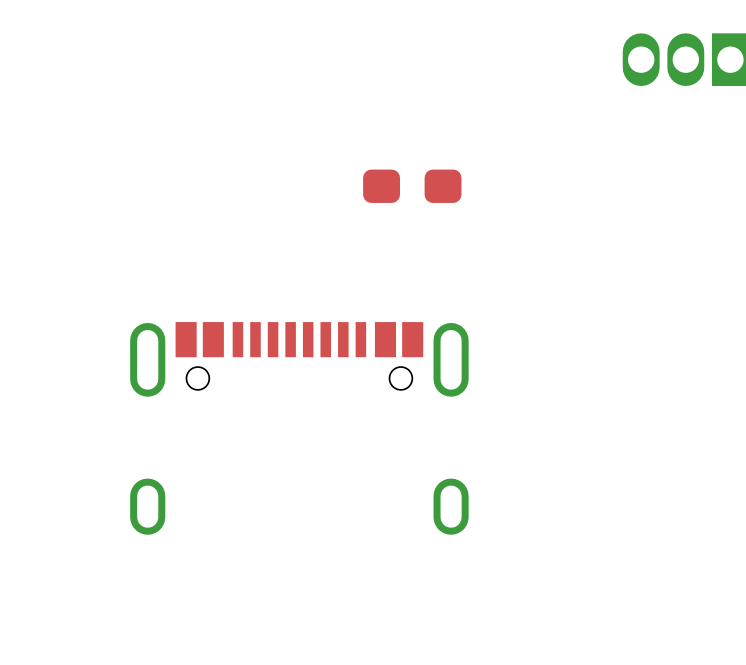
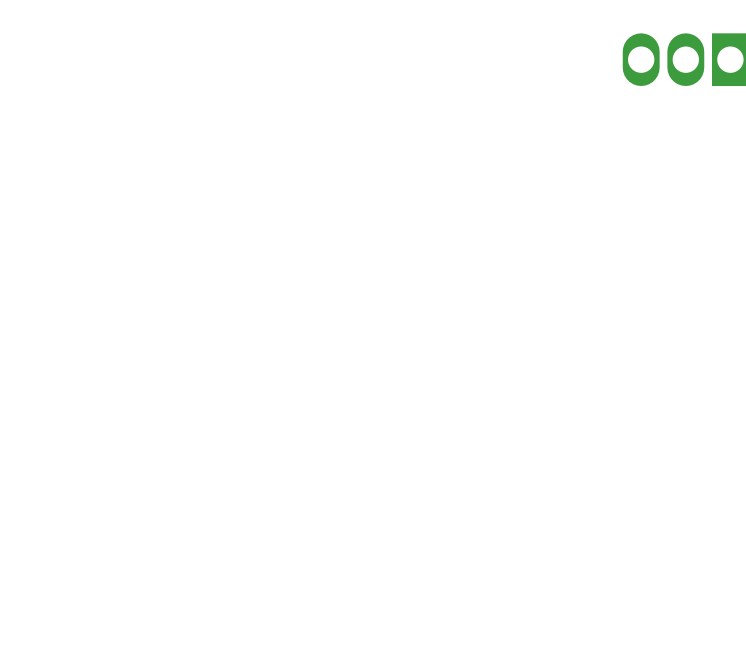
part: (412, 186) -> none
part: (299, 428) -> none

